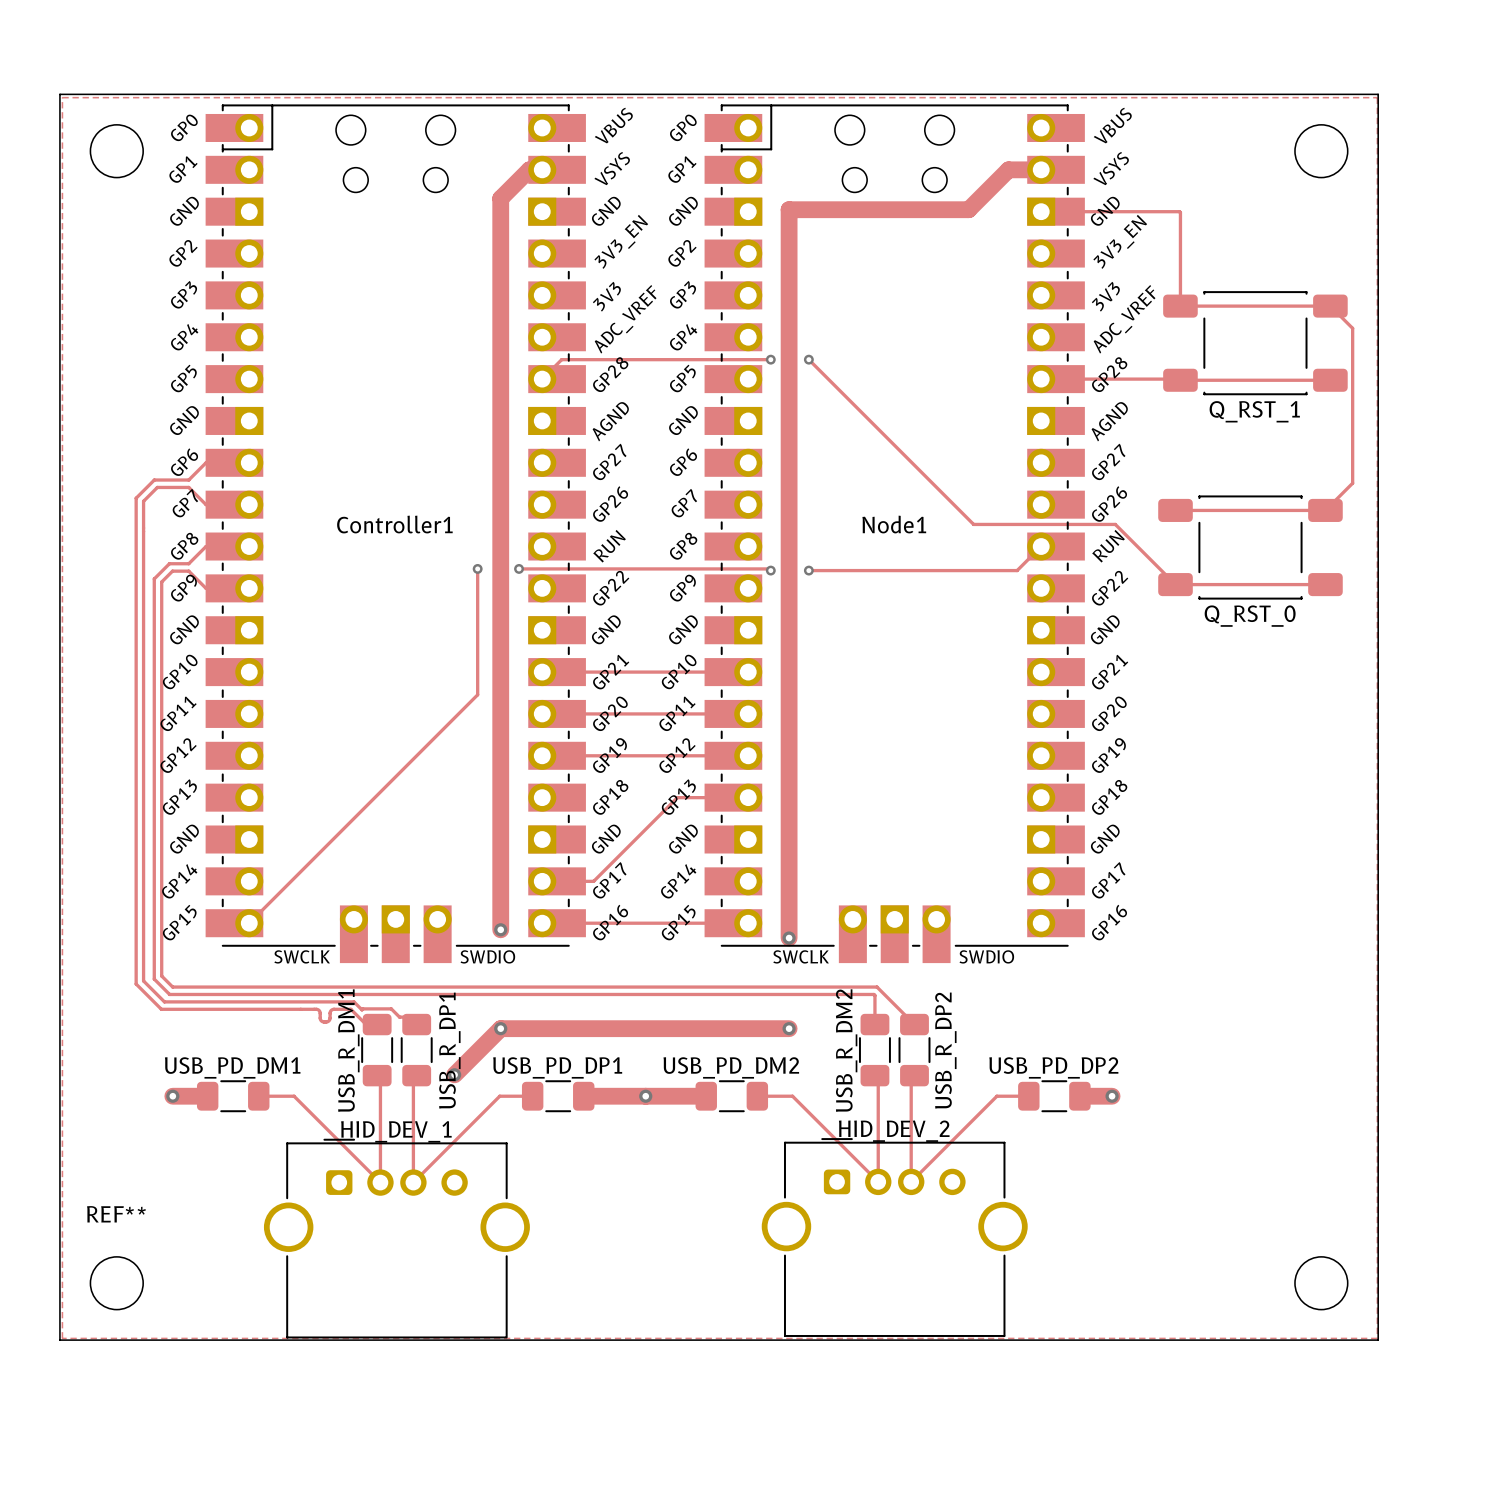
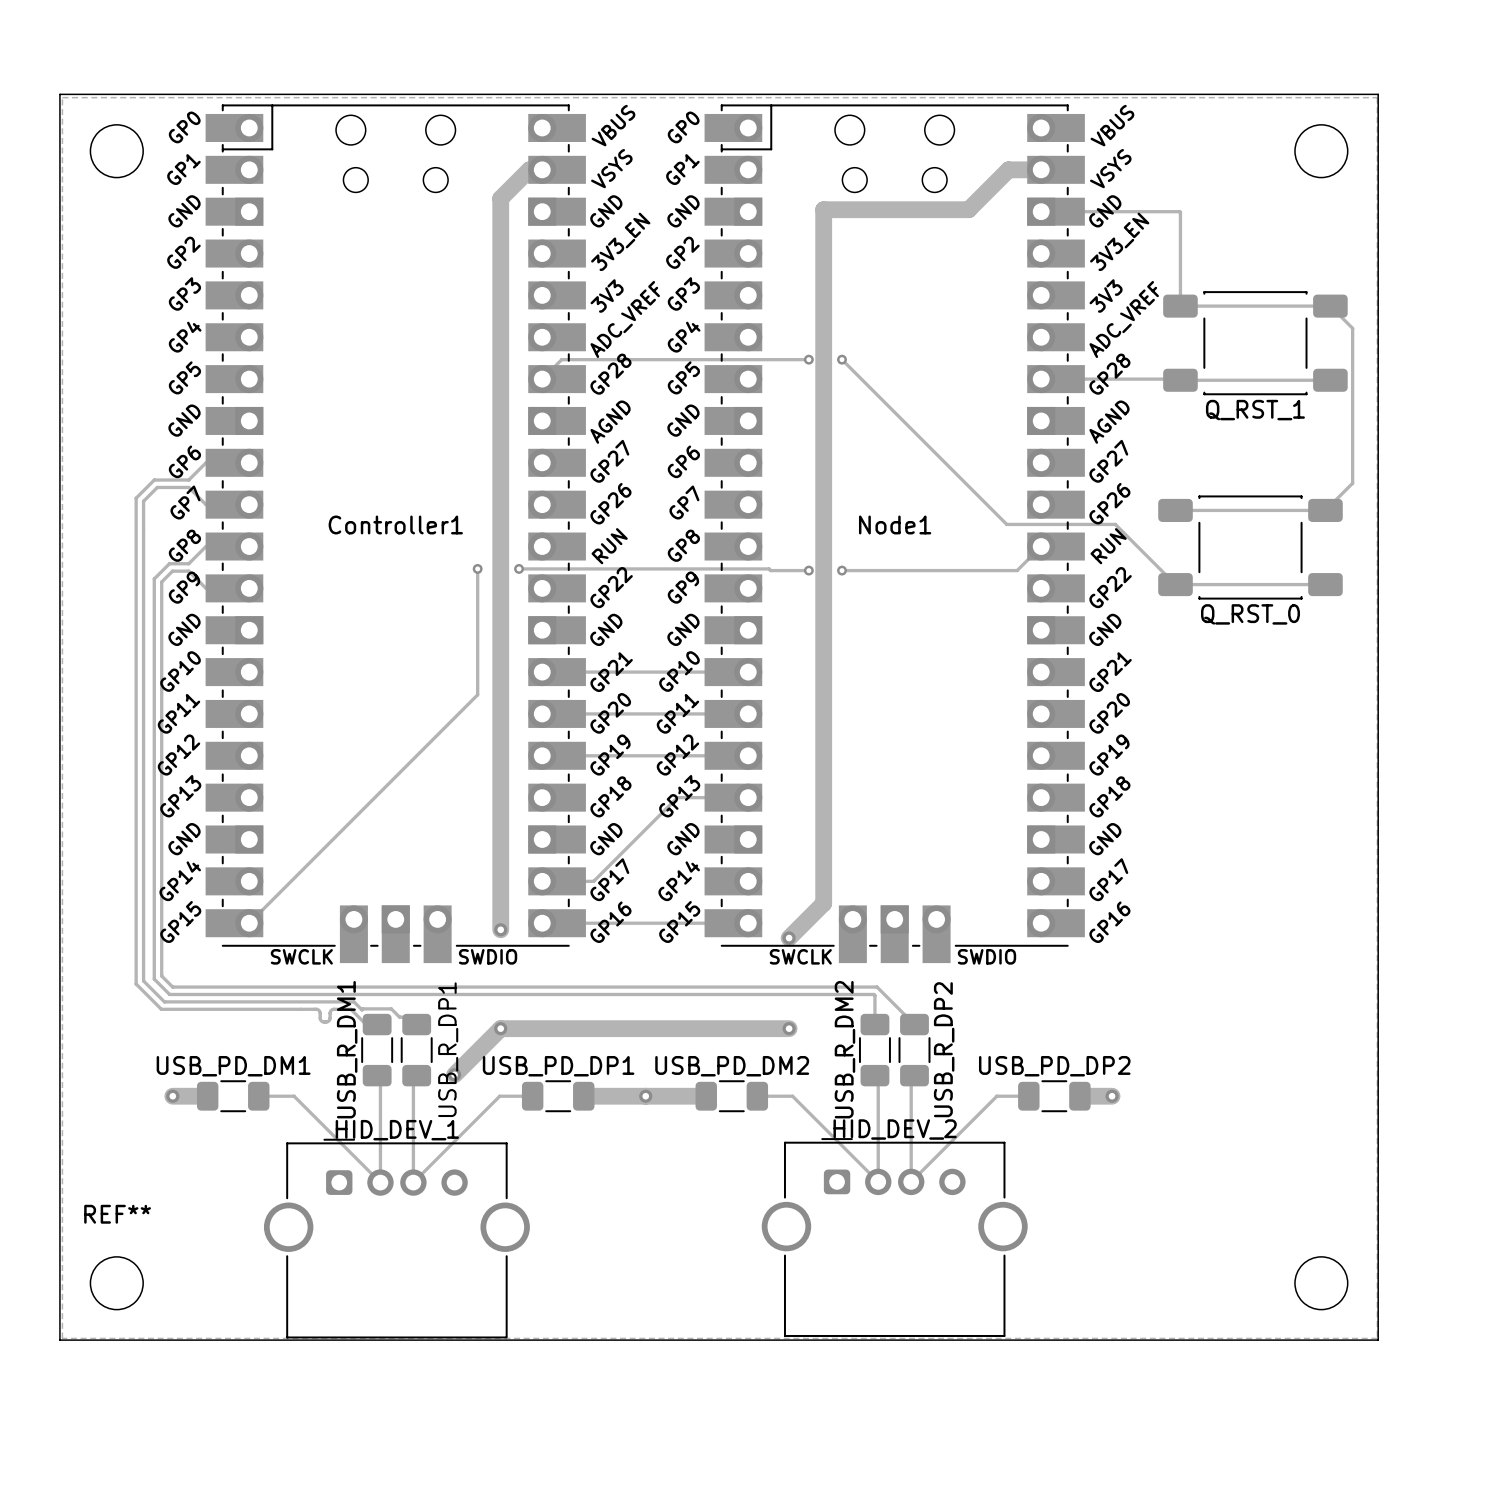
track: (823, 209) (789, 209) (789, 938) -> (823, 209) (823, 903) (789, 938)
track: none -> (770, 359) (805, 359)
via position: (770, 359) -> (841, 359)
track: (808, 359) (973, 524) (1006, 524) -> (841, 359) (1006, 524)
track: none -> (770, 570) (805, 570)
via position: (770, 570) -> (841, 570)
track: (808, 570) (841, 570) -> none

